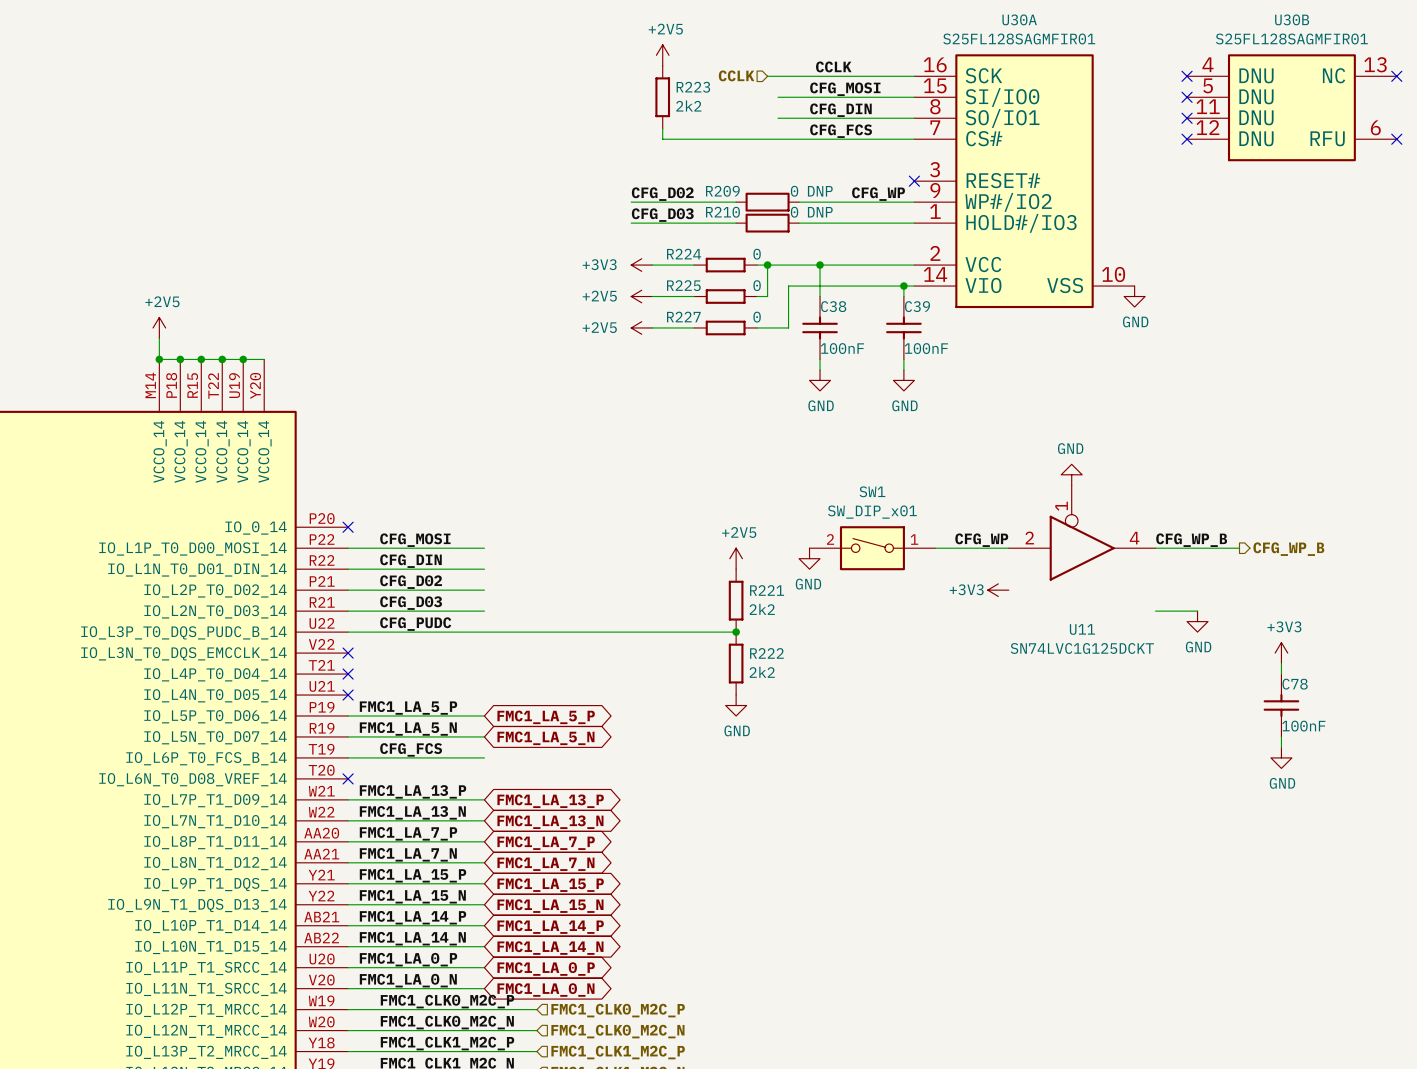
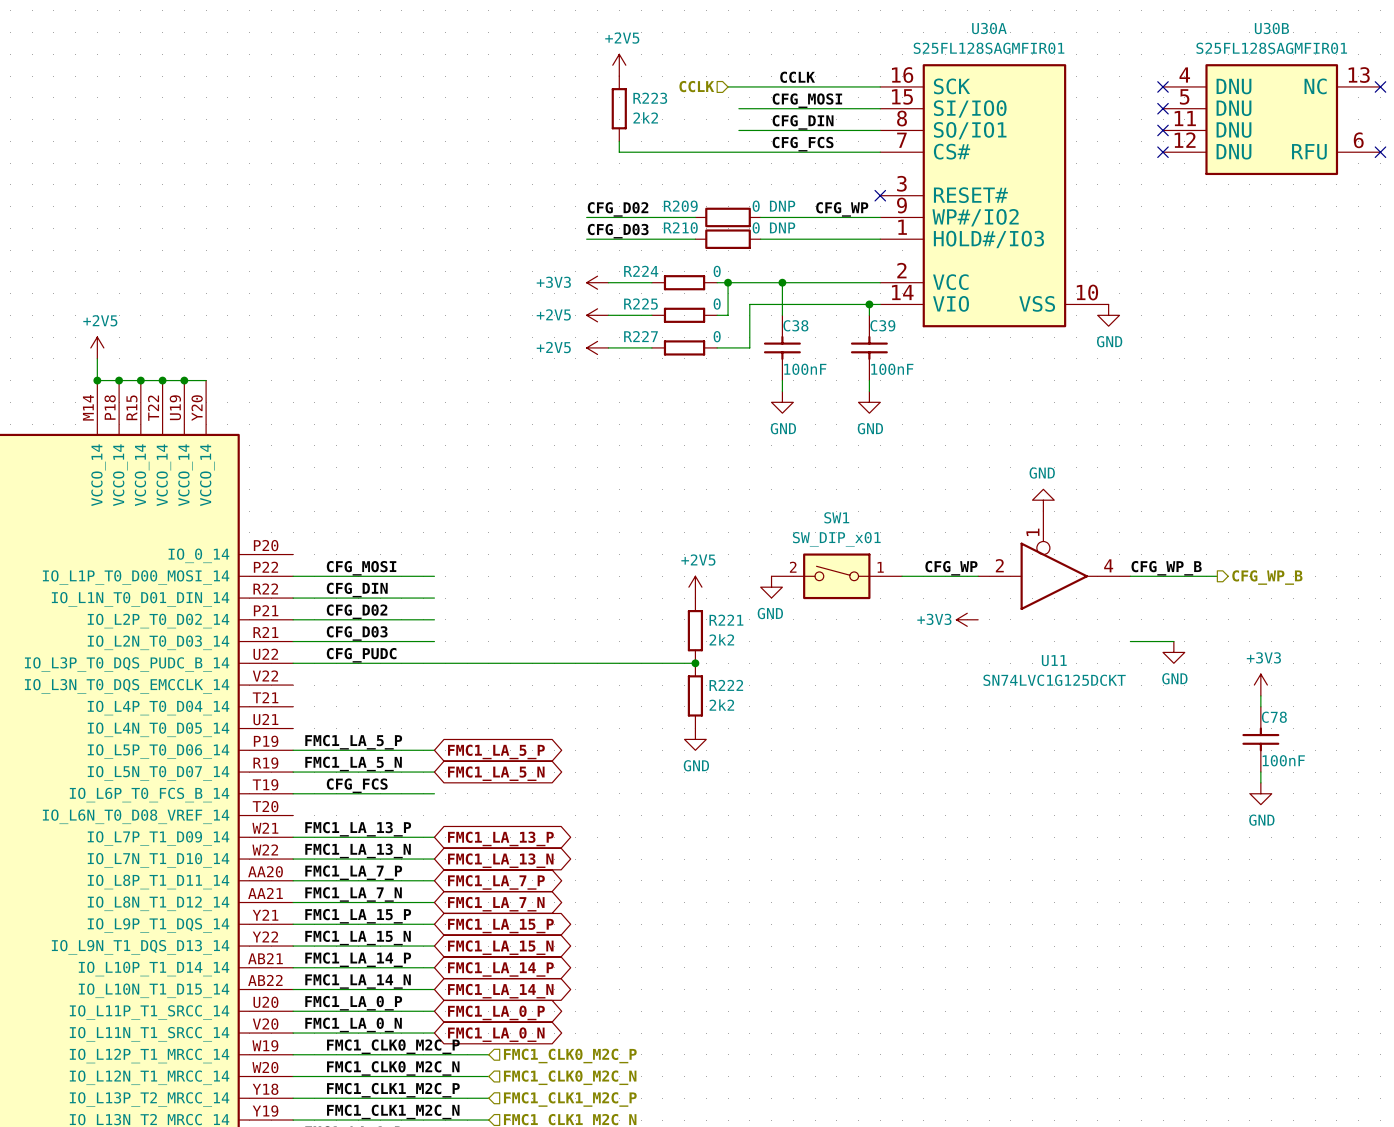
no-connect mark: (348, 527) -> none
no-connect mark: (348, 653) -> none
no-connect mark: (348, 674) -> none
no-connect mark: (348, 695) -> none
no-connect mark: (348, 778) -> none

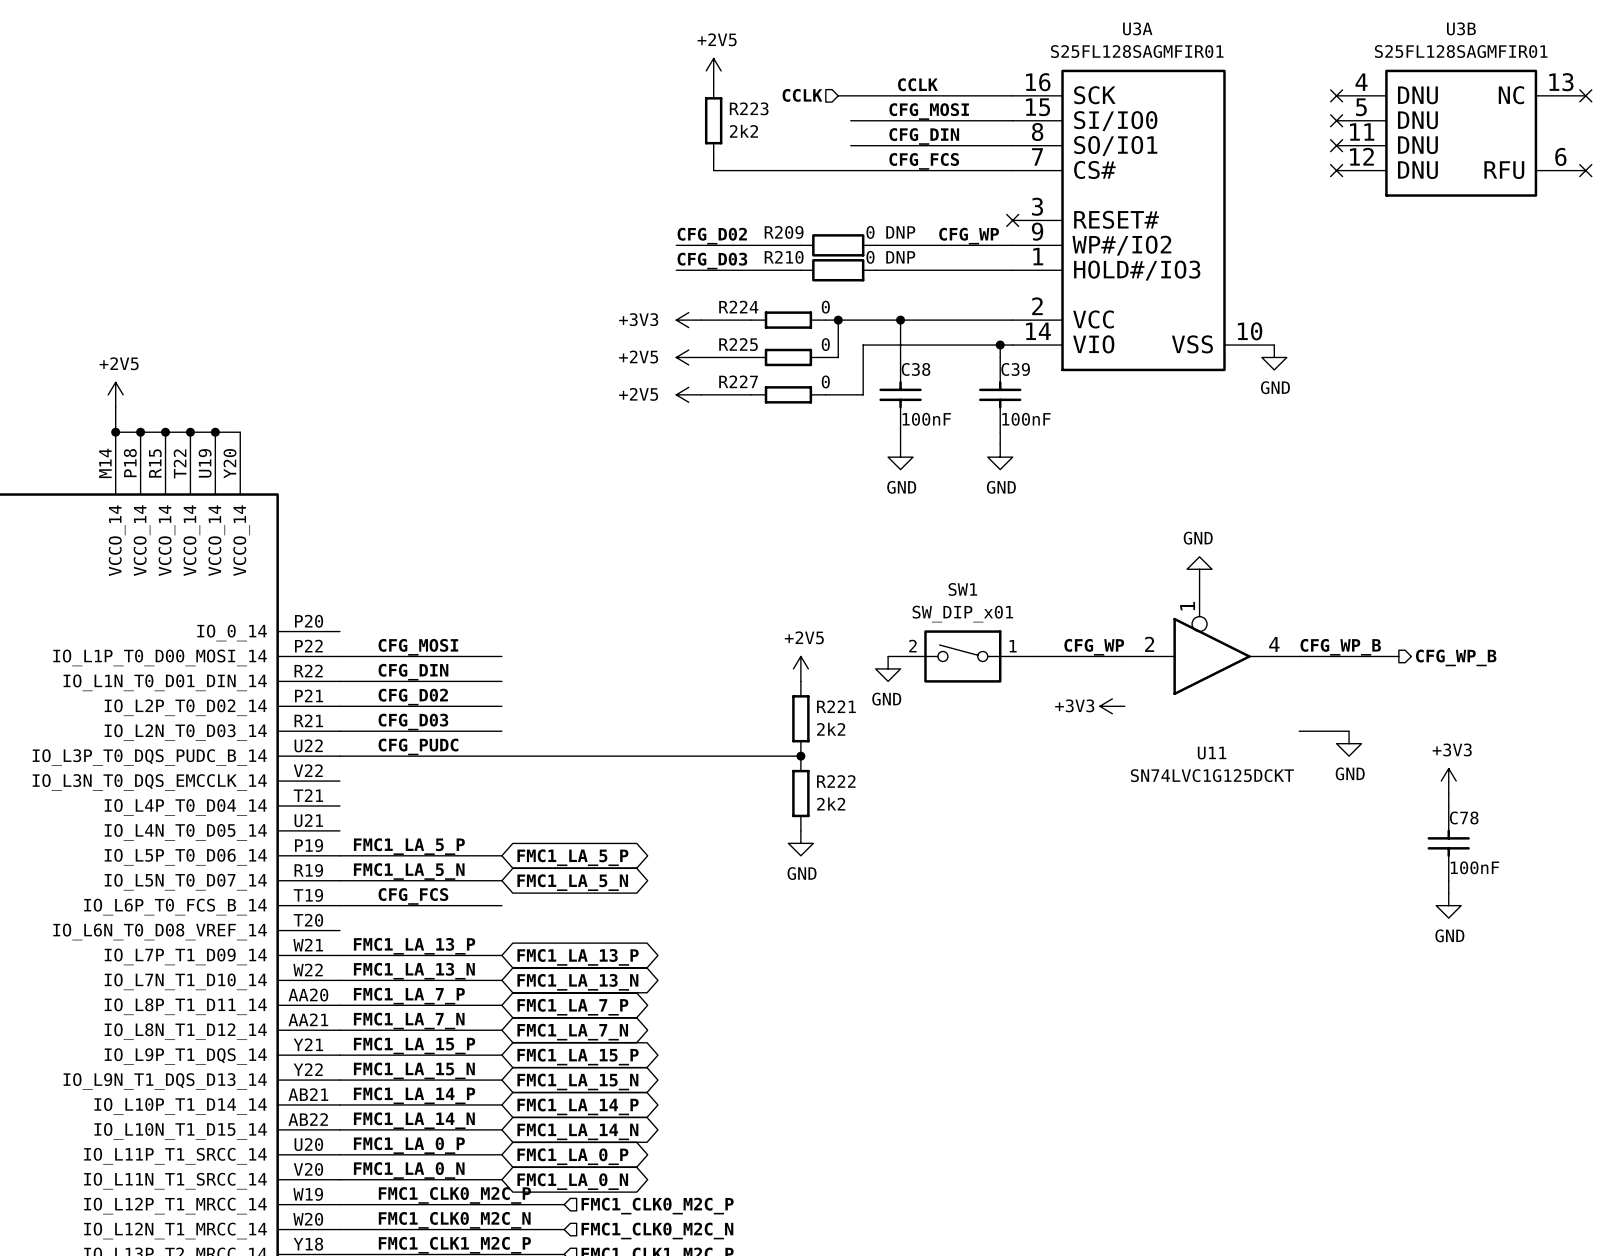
U30A name: U30A (989, 28) -> U3A (1137, 28)
U30B name: U30B (1271, 28) -> U3B (1461, 28)

